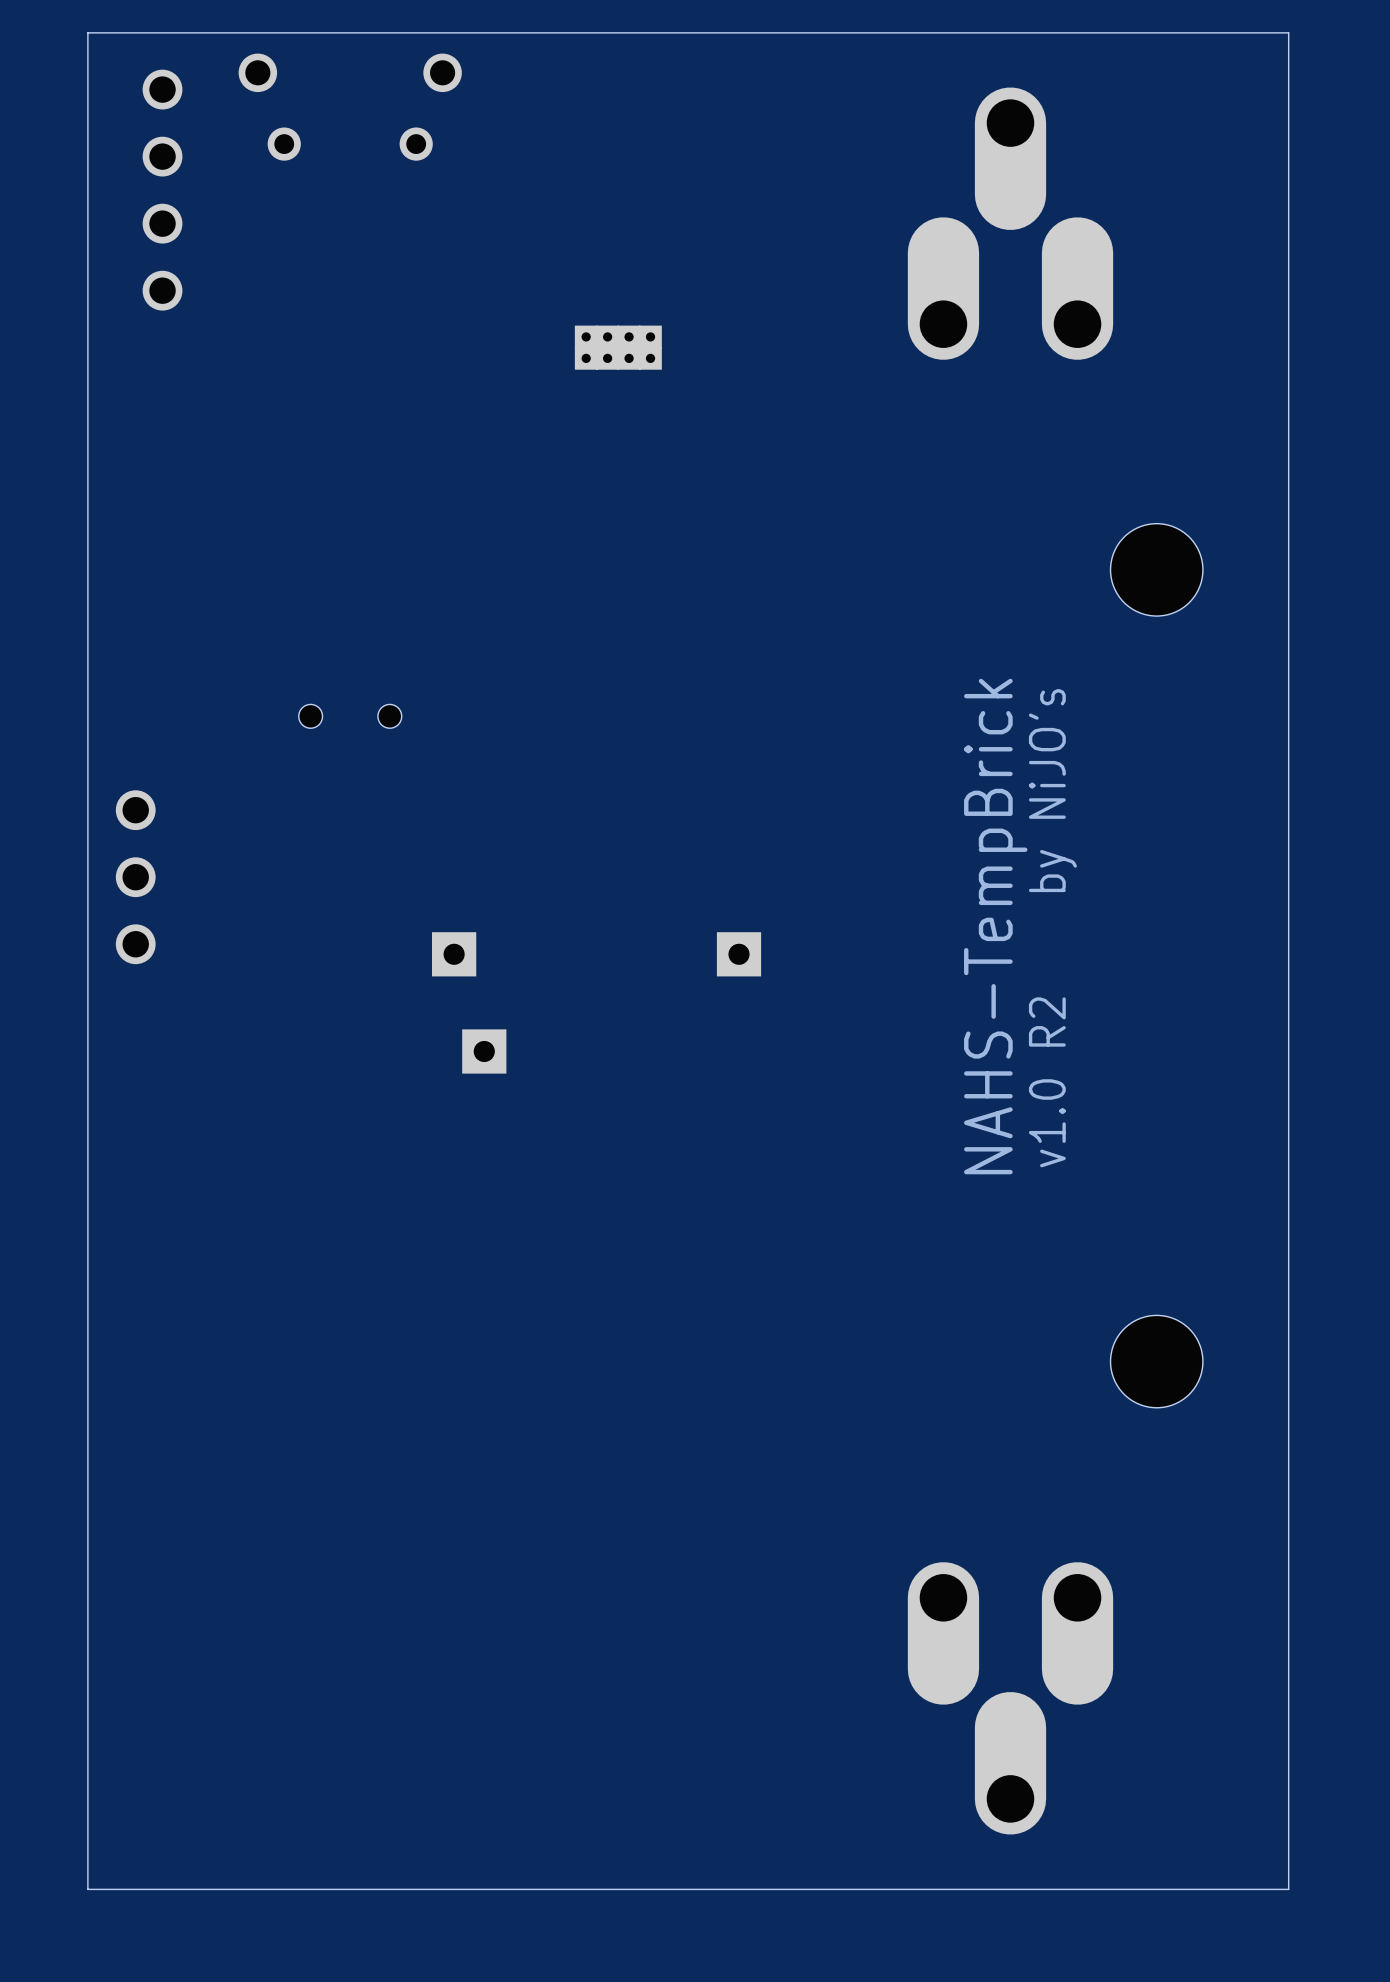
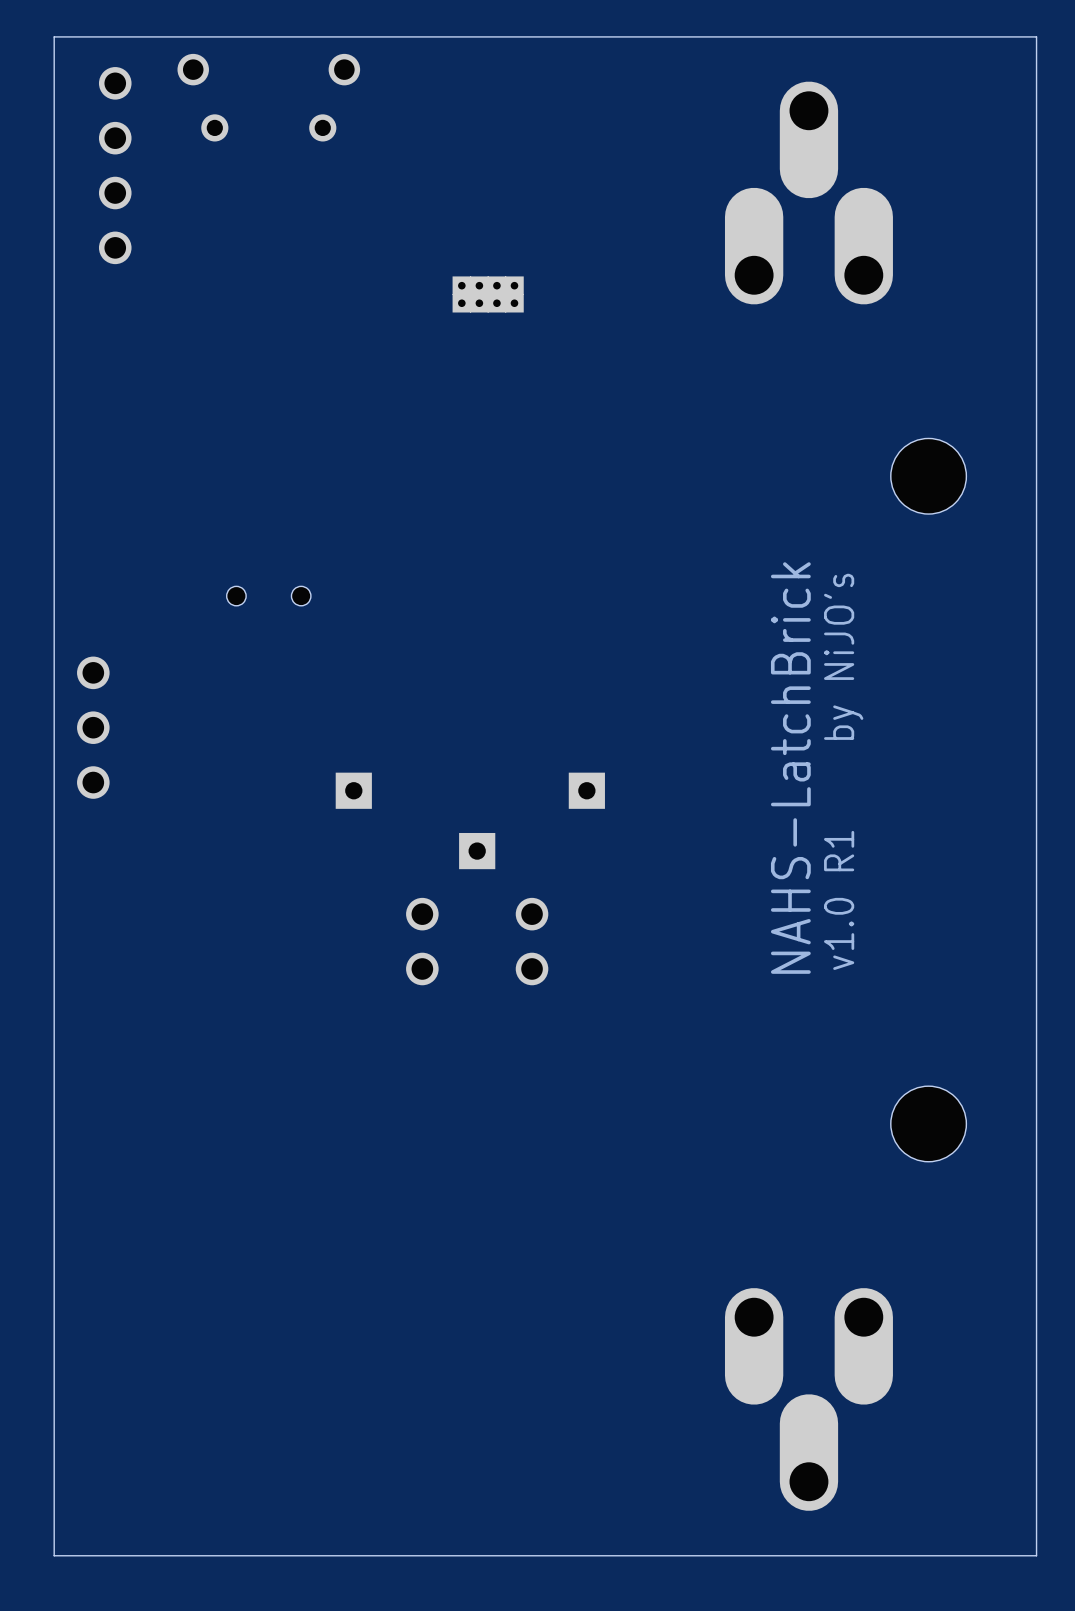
text: NAHS-TempBrick (995, 926) -> NAHS-LatchBrick (790, 768)
part position: (484, 1051) -> (477, 851)
text: v1.0 R2 (1047, 1082) -> v1.0 R1 (839, 900)
part: none -> (422, 941)
part: none -> (532, 941)

